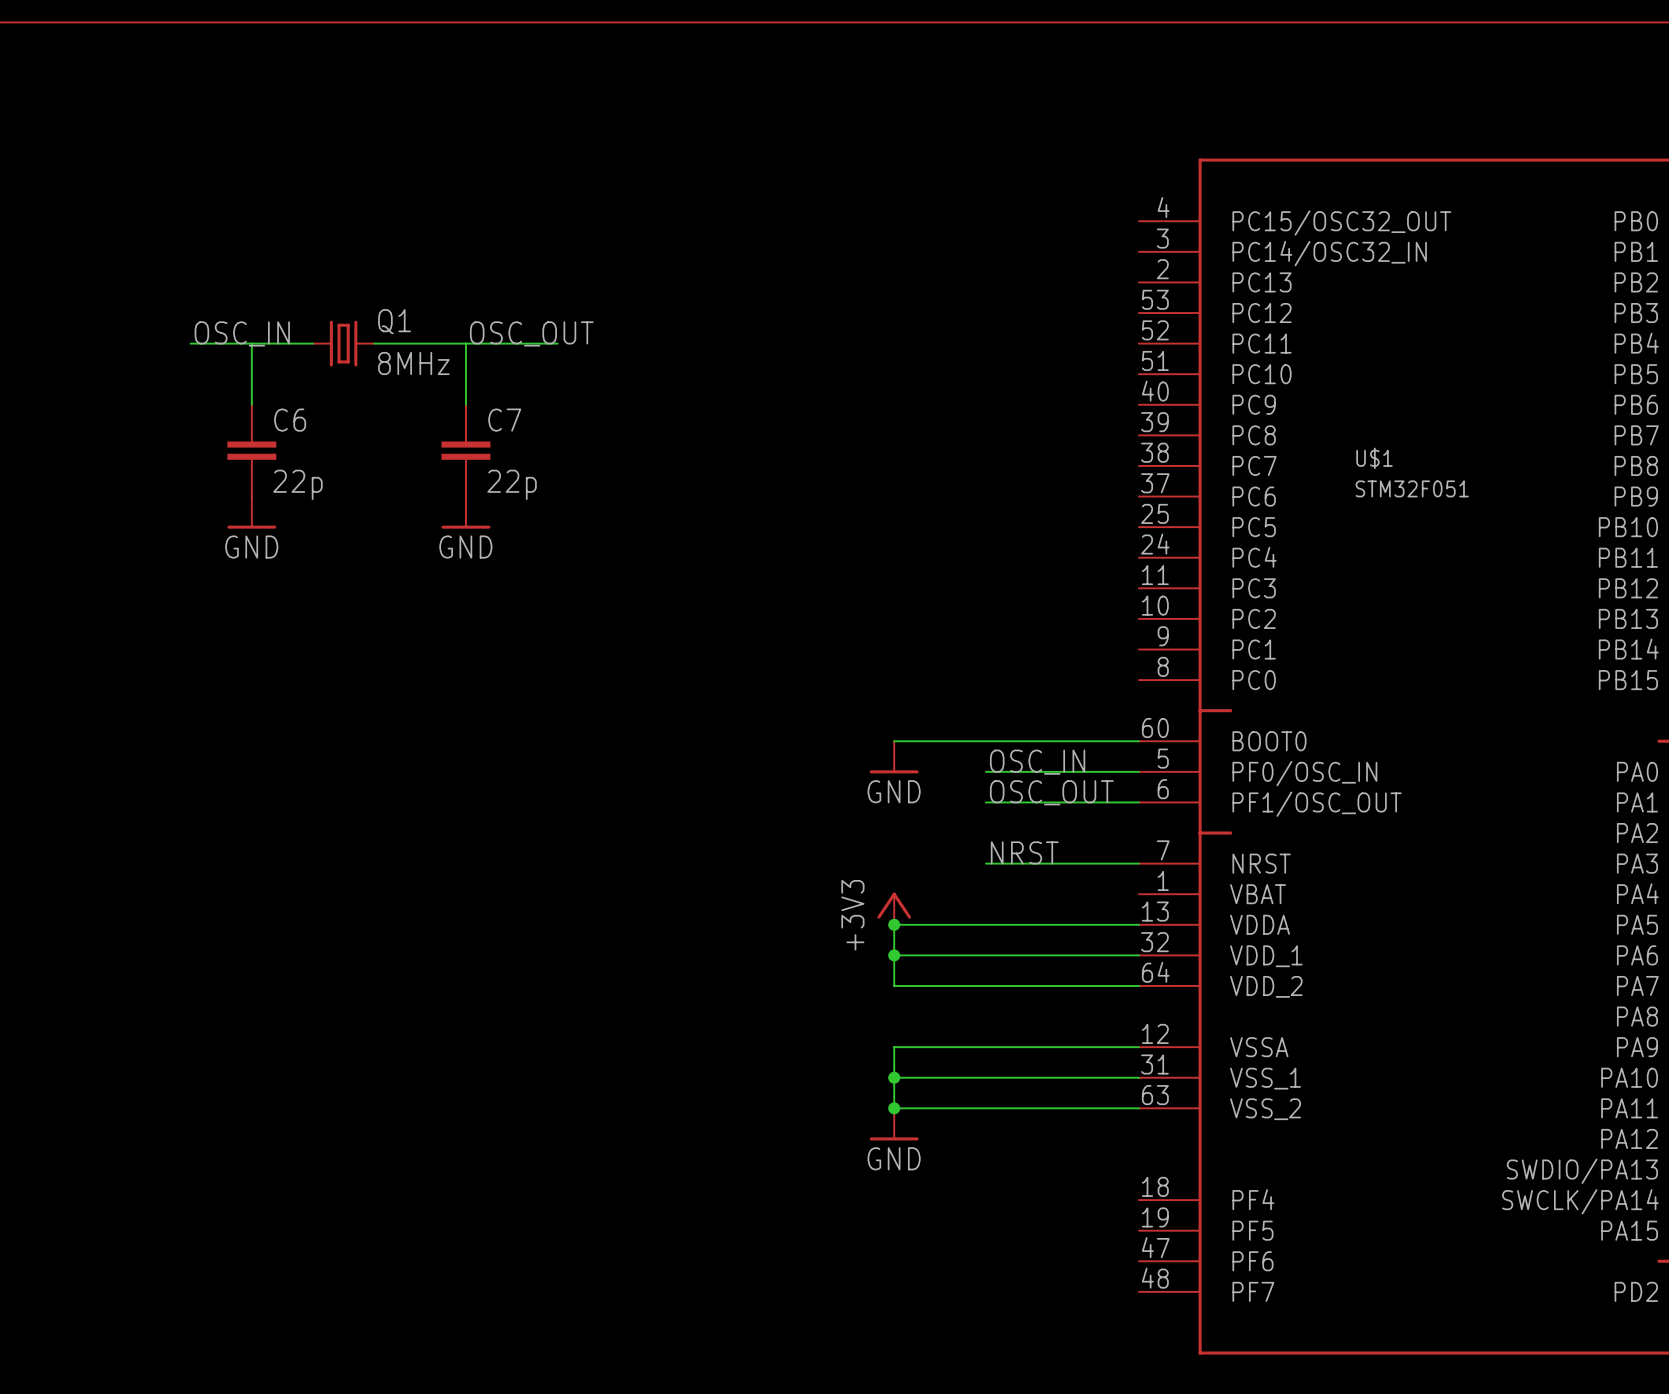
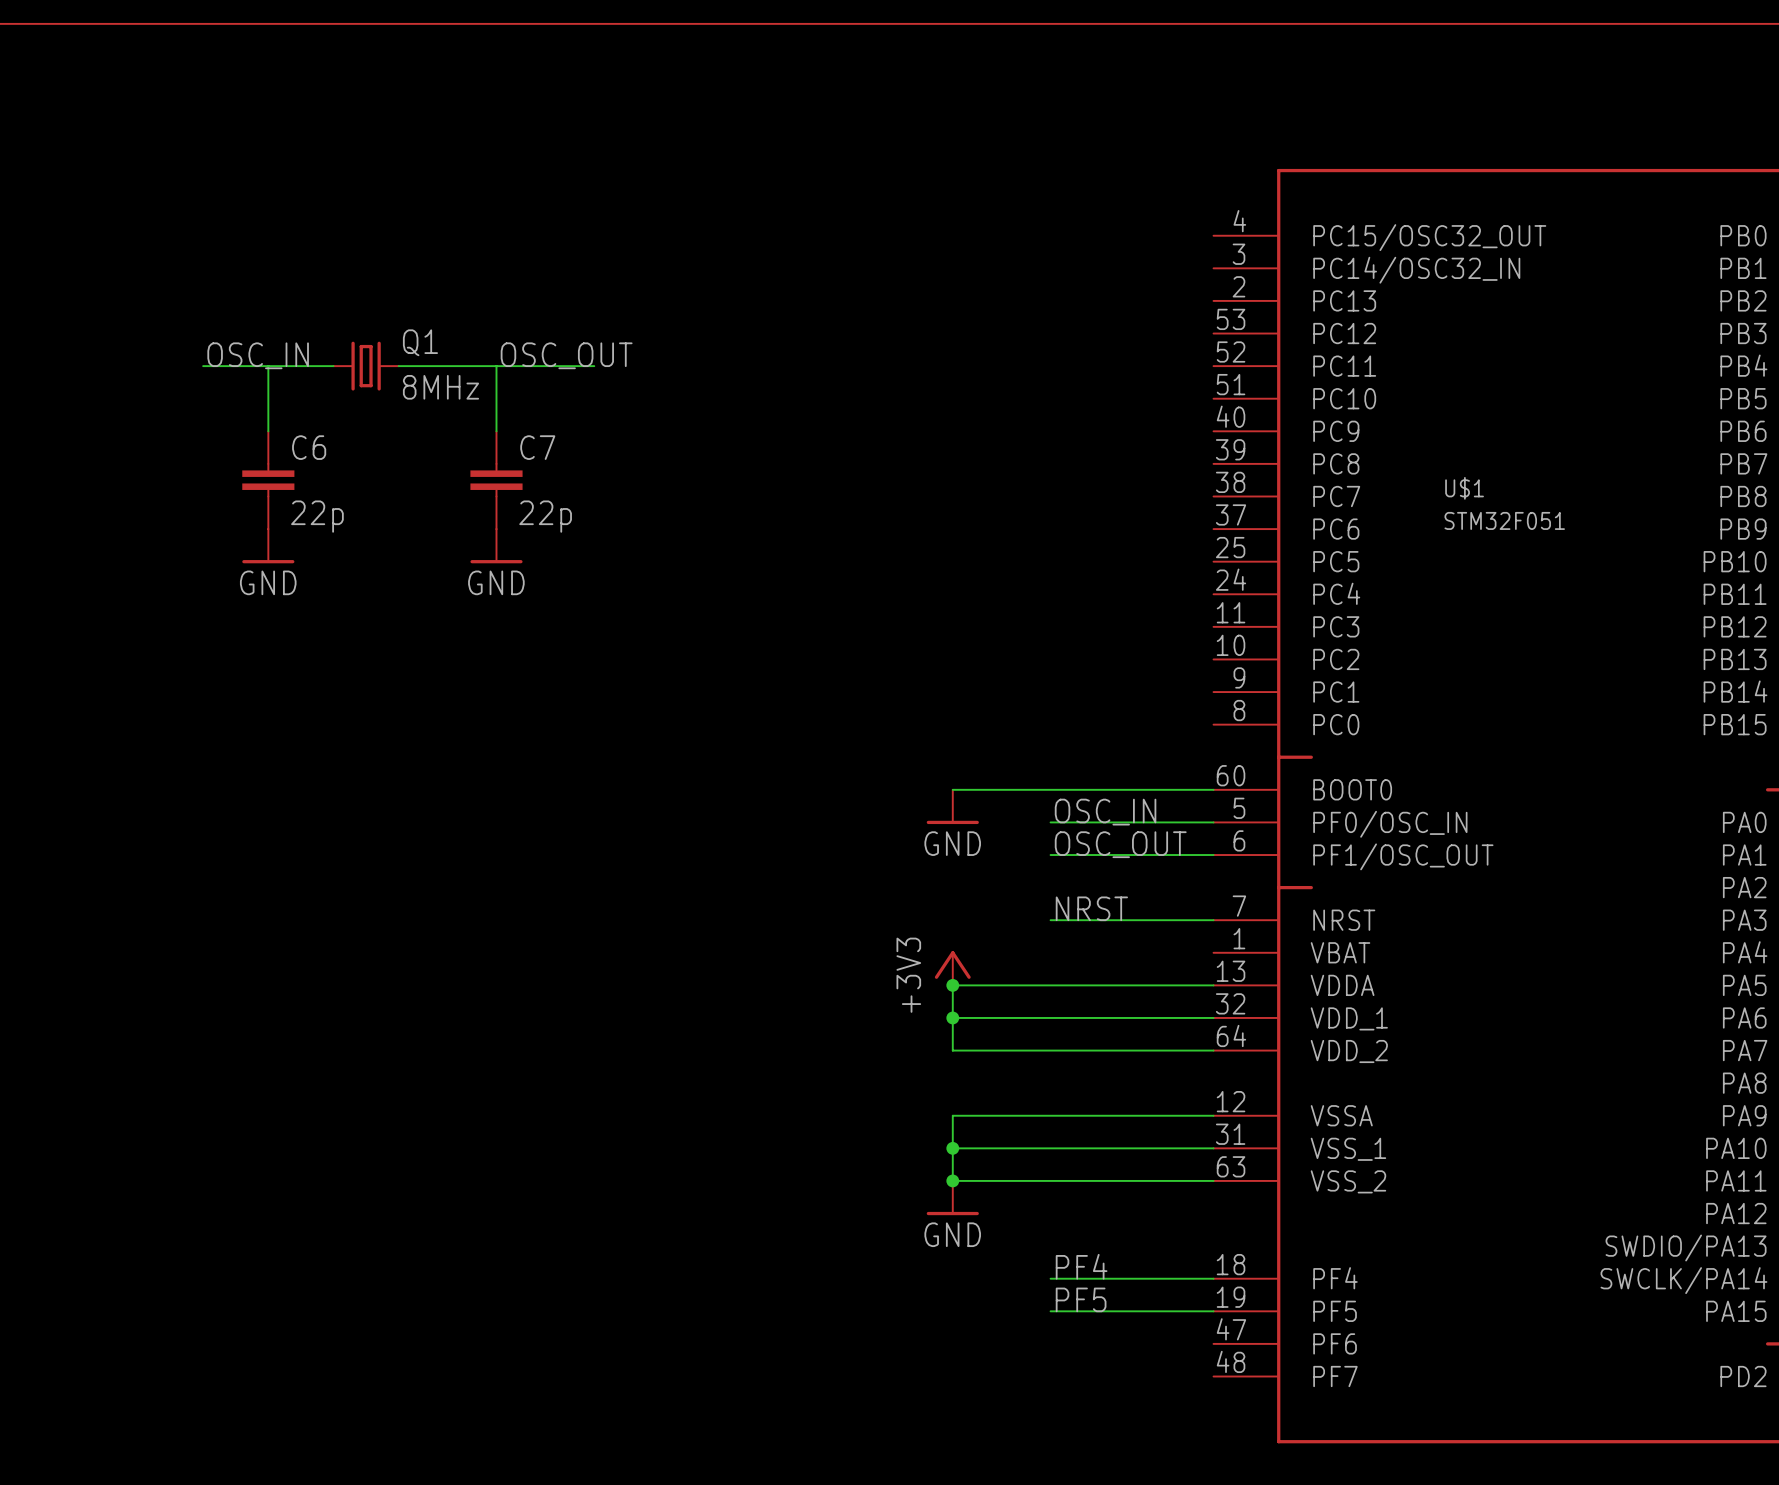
label: none -> PF4 (1081, 1266)
wire: none -> (1050, 1278) (1213, 1278)
label: none -> PF5 (1081, 1299)
wire: none -> (1050, 1311) (1213, 1311)

